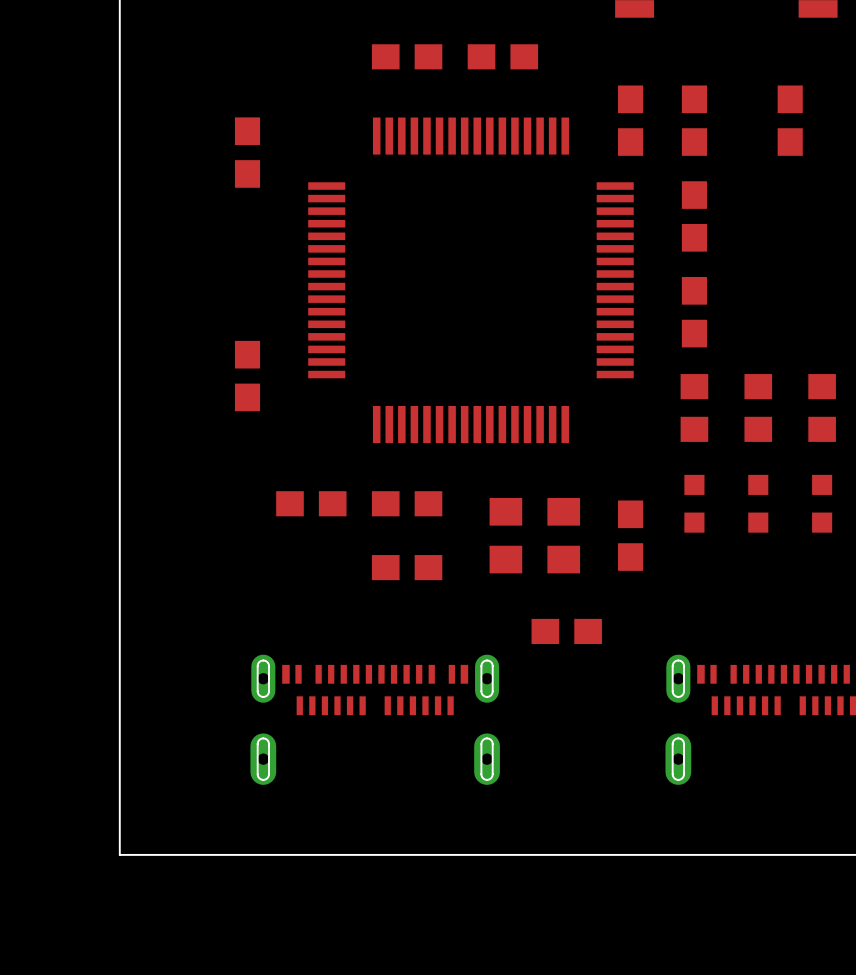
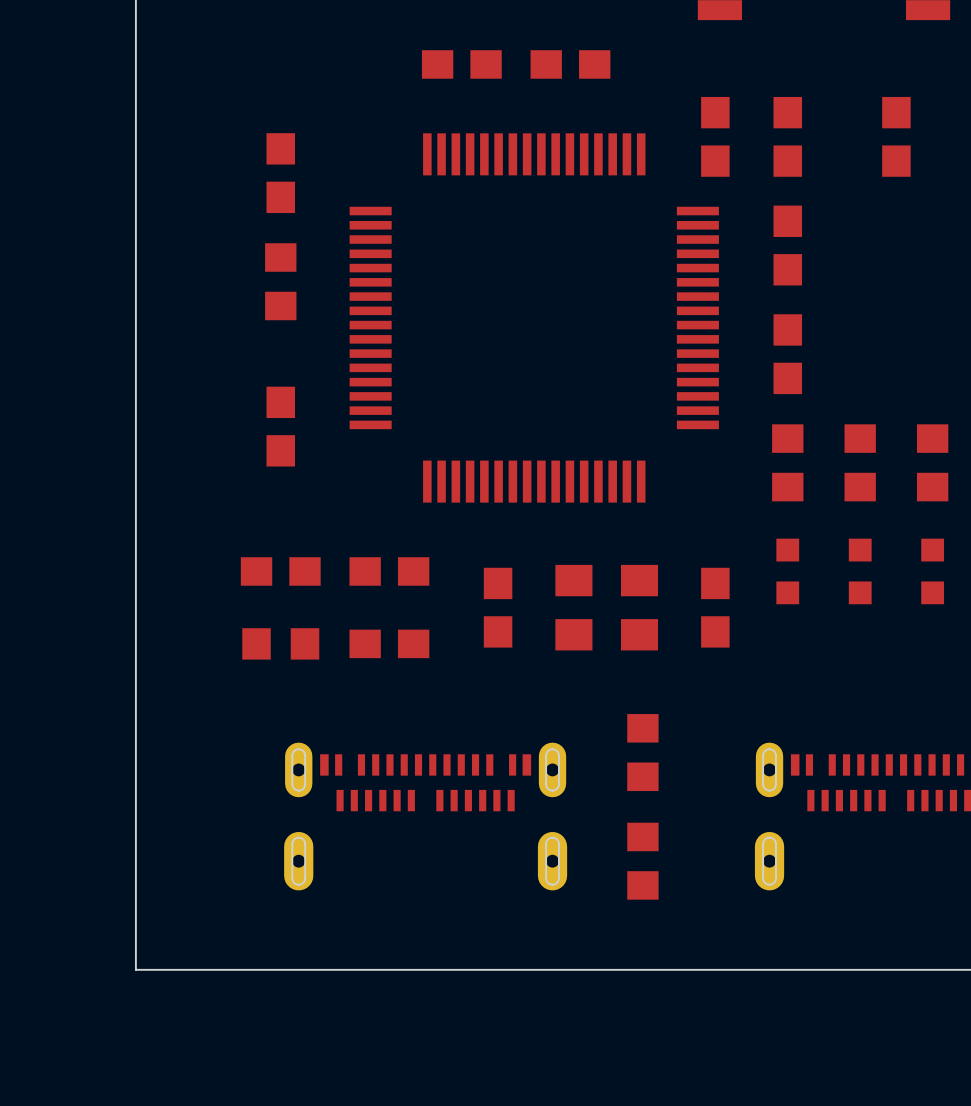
part: none -> (280, 281)
part: none -> (280, 571)
part: (311, 503) -> none
part: none -> (389, 571)
part: (407, 503) -> none
part: none -> (498, 607)
part: none -> (280, 643)
part: none -> (389, 643)
part: (407, 567) -> none
part: (566, 631) -> none
part: none -> (642, 752)
part: none -> (642, 861)

